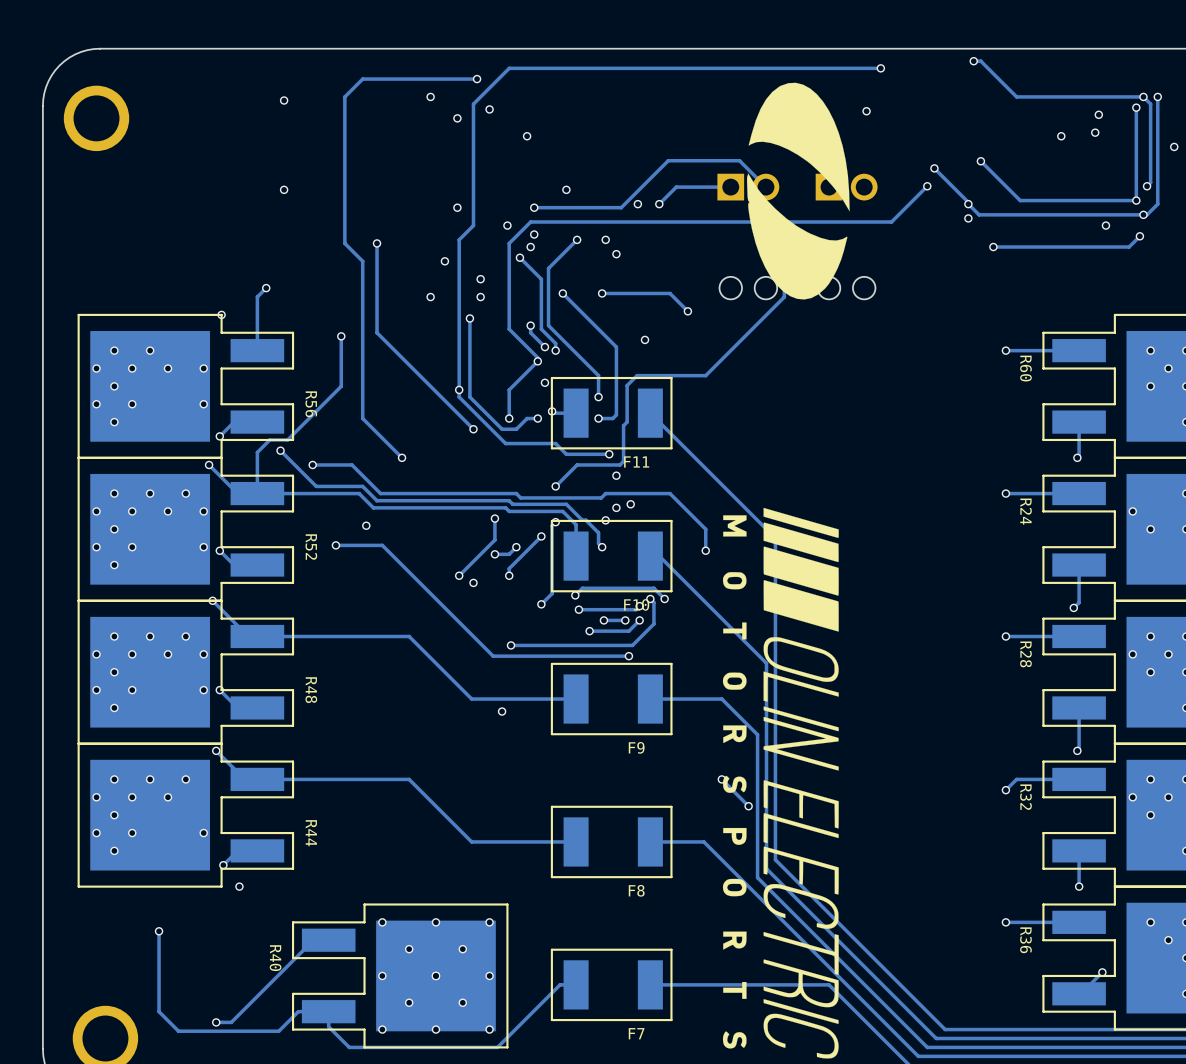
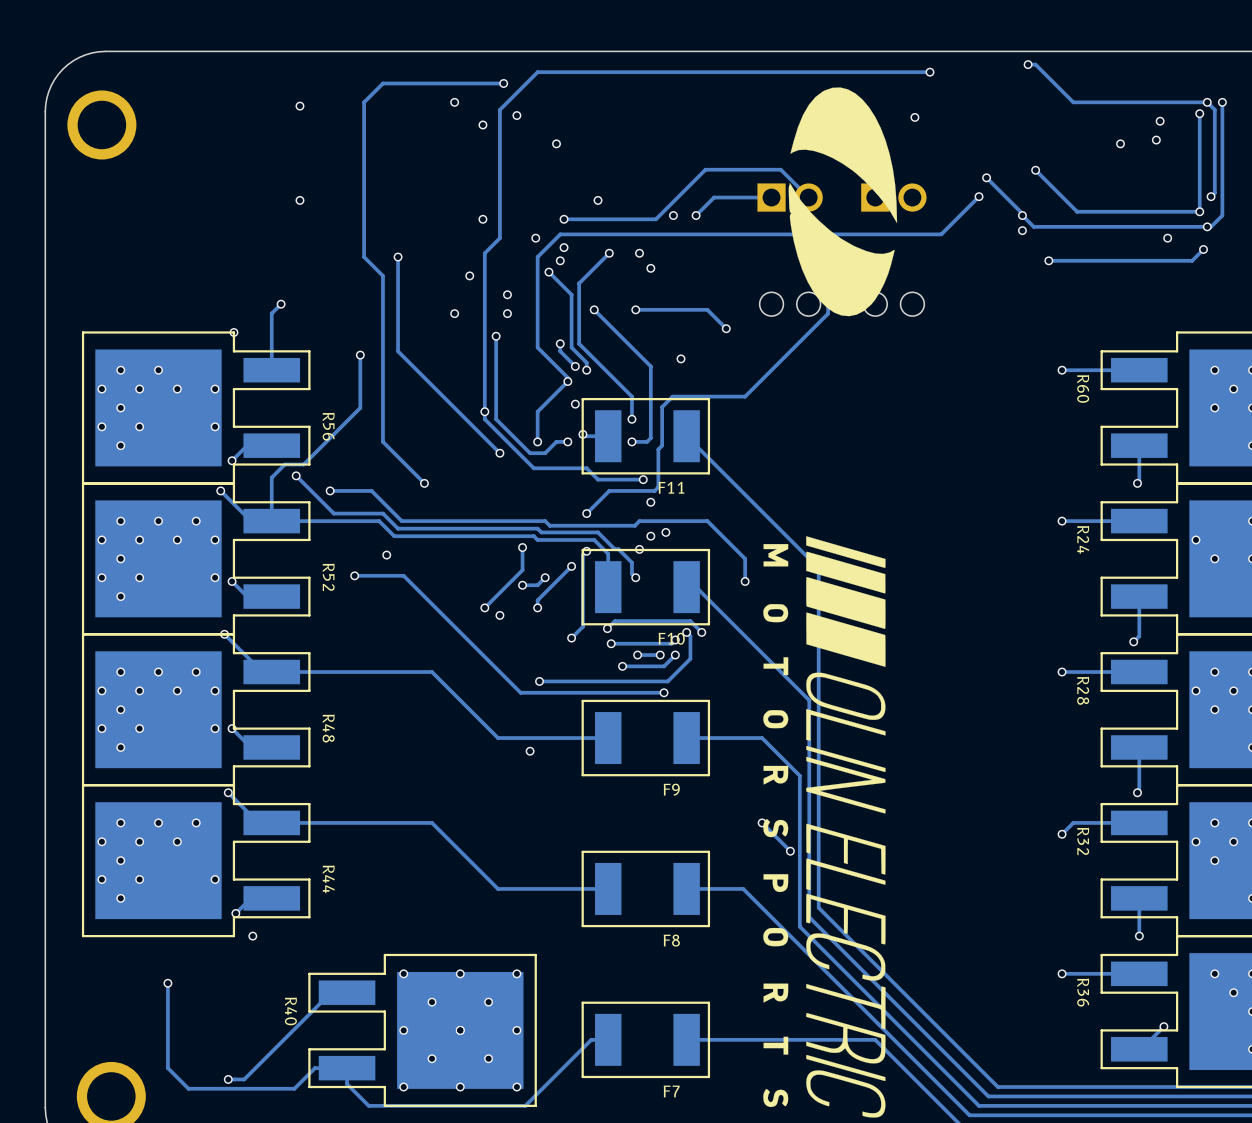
via: (1174, 146) -> none

